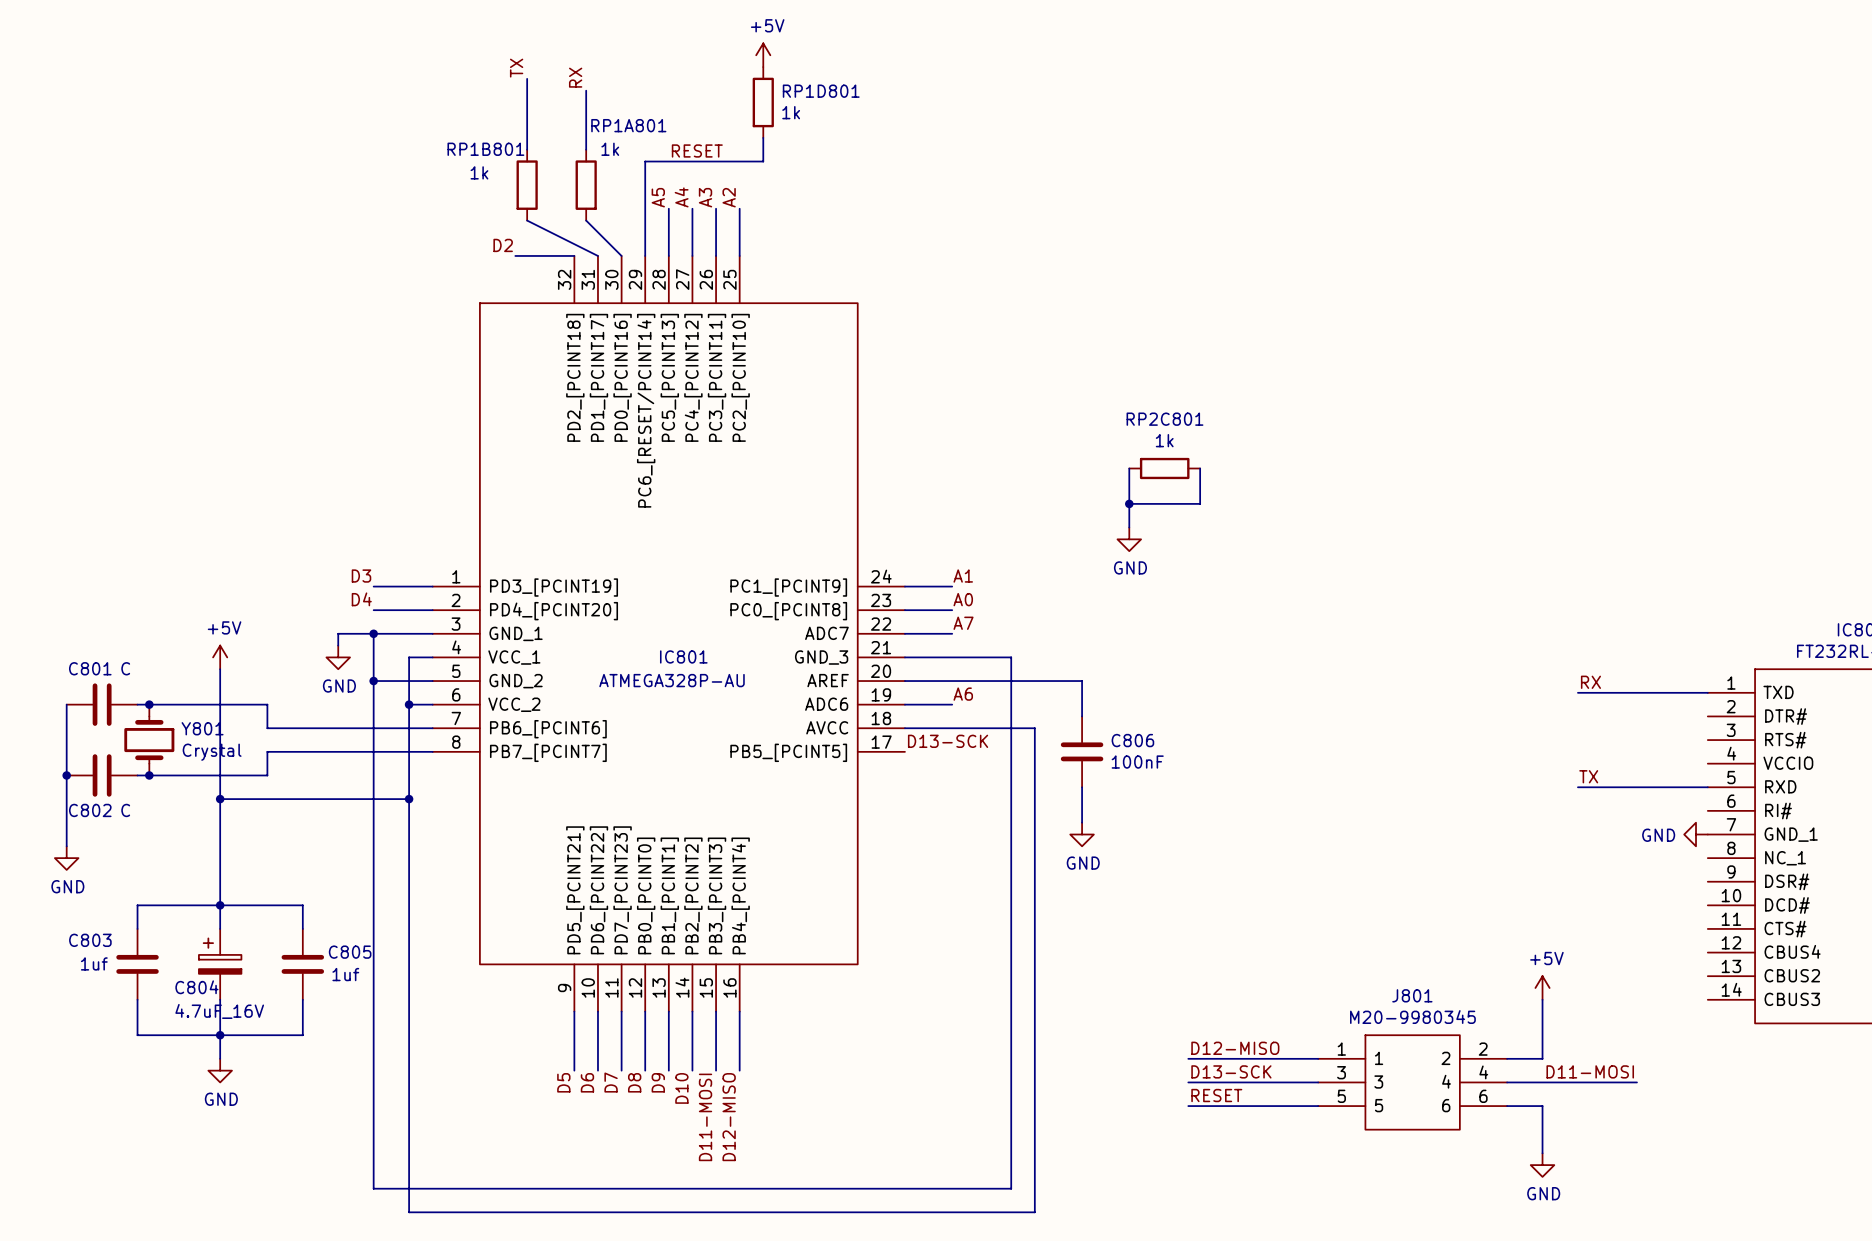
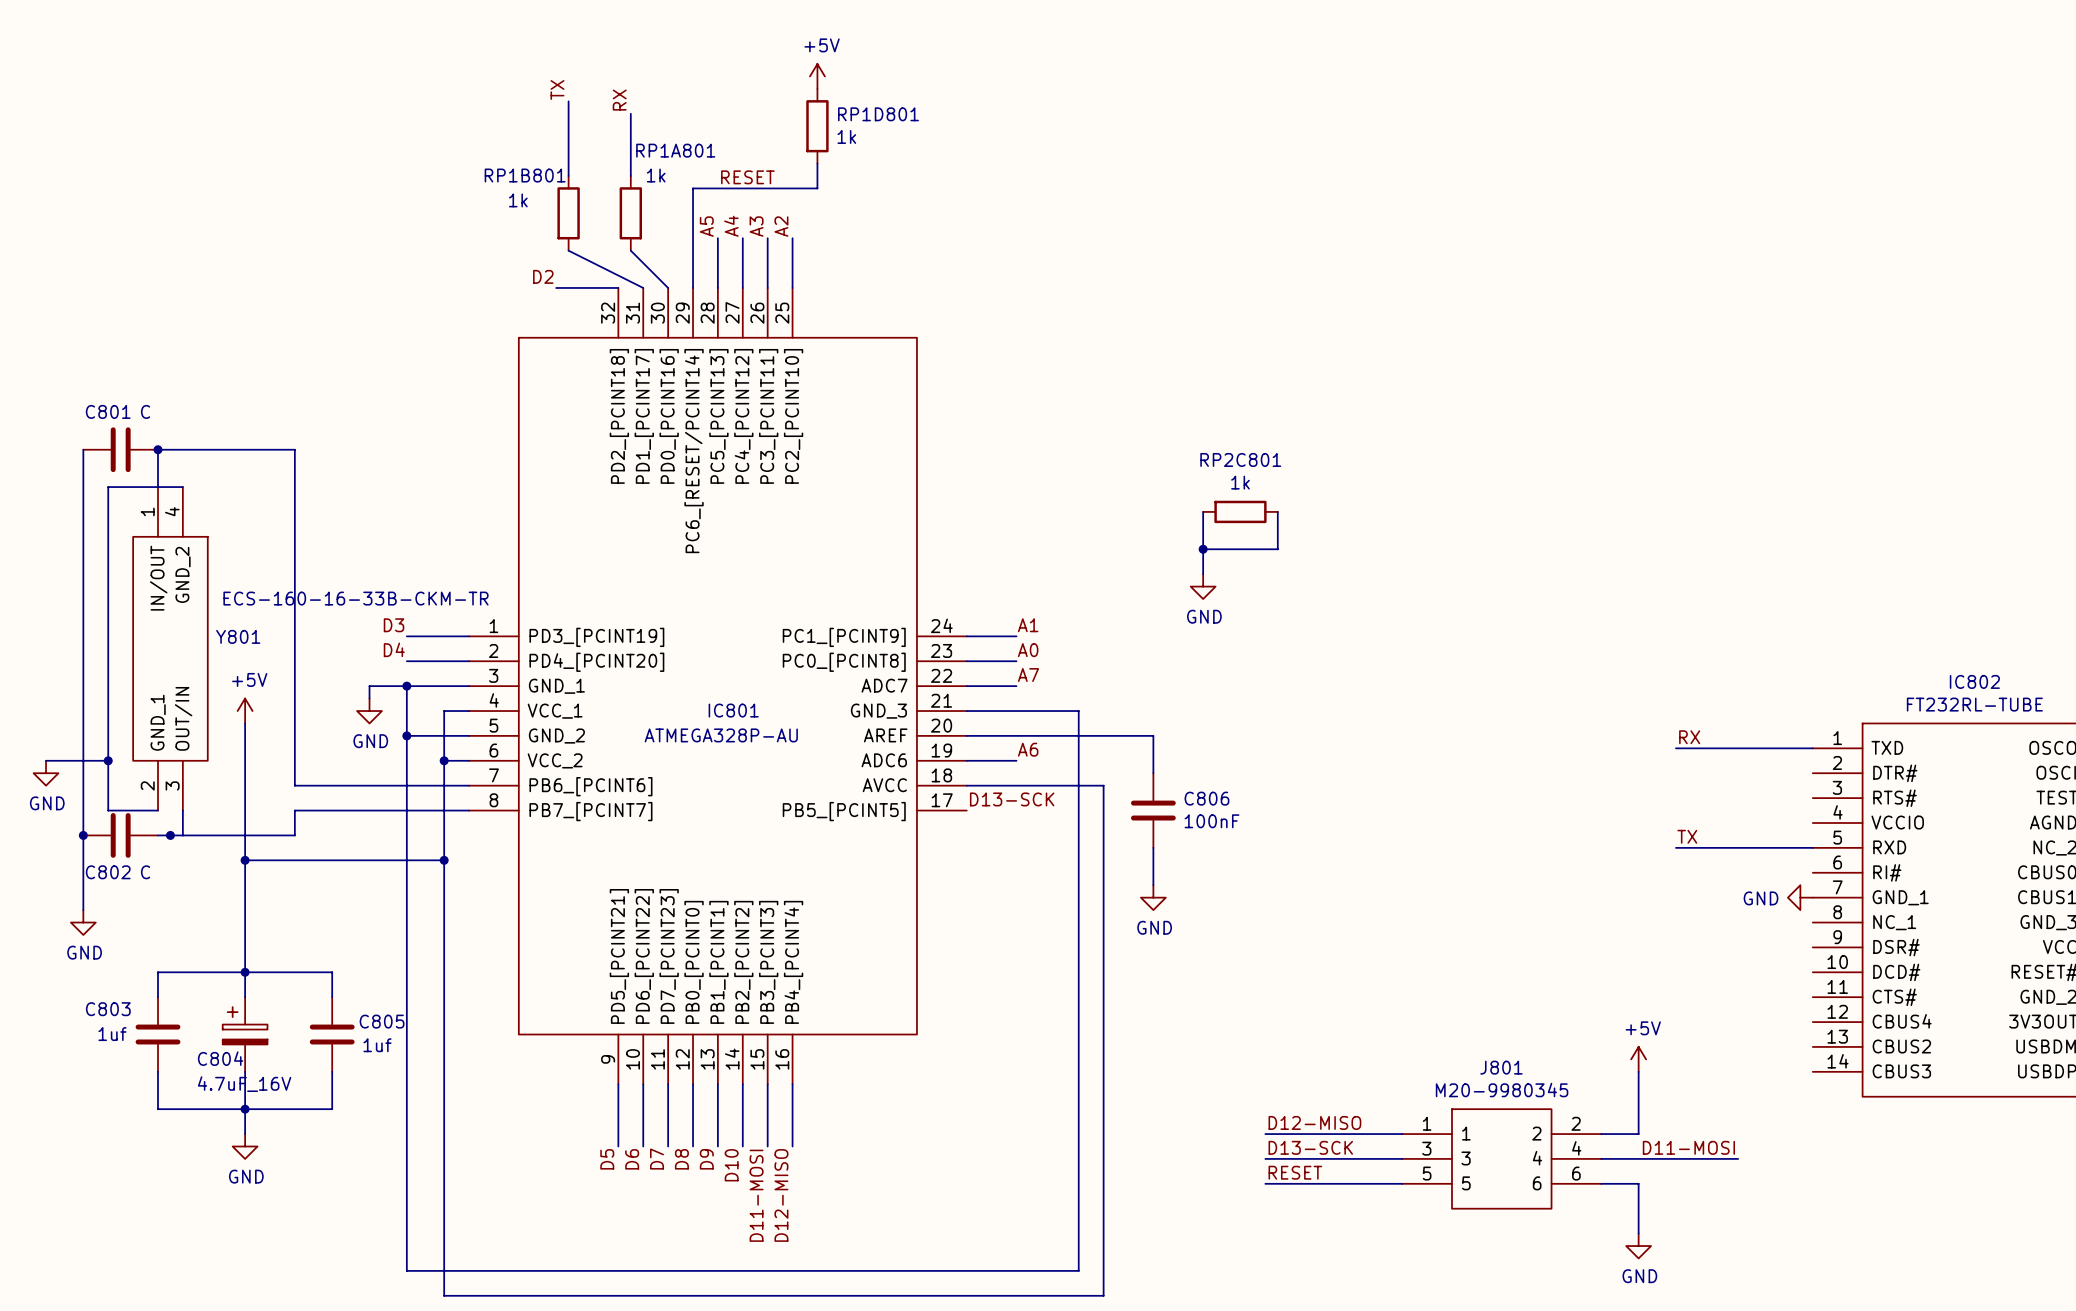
wire: none -> (83, 449) (83, 760)
junction: none -> (158, 449)
wire: none -> (182, 487) (108, 487) (108, 810) (158, 810)
wire: none -> (46, 760) (108, 760)
junction: none -> (108, 760)
C801 position: (102, 704) -> (120, 449)
Y801 symbol: [124, 704, 175, 776] -> [132, 487, 209, 811]
wire: (137, 704) (267, 704) -> (158, 487) (158, 449) (294, 449) (294, 760)
junction: (149, 704) -> none
power symbol: none -> GND (46, 773)
wire: none -> (182, 810) (182, 835)
Y801 value: Crystal (212, 752) -> ECS-160-16-33B-CKM-TR (355, 598)

